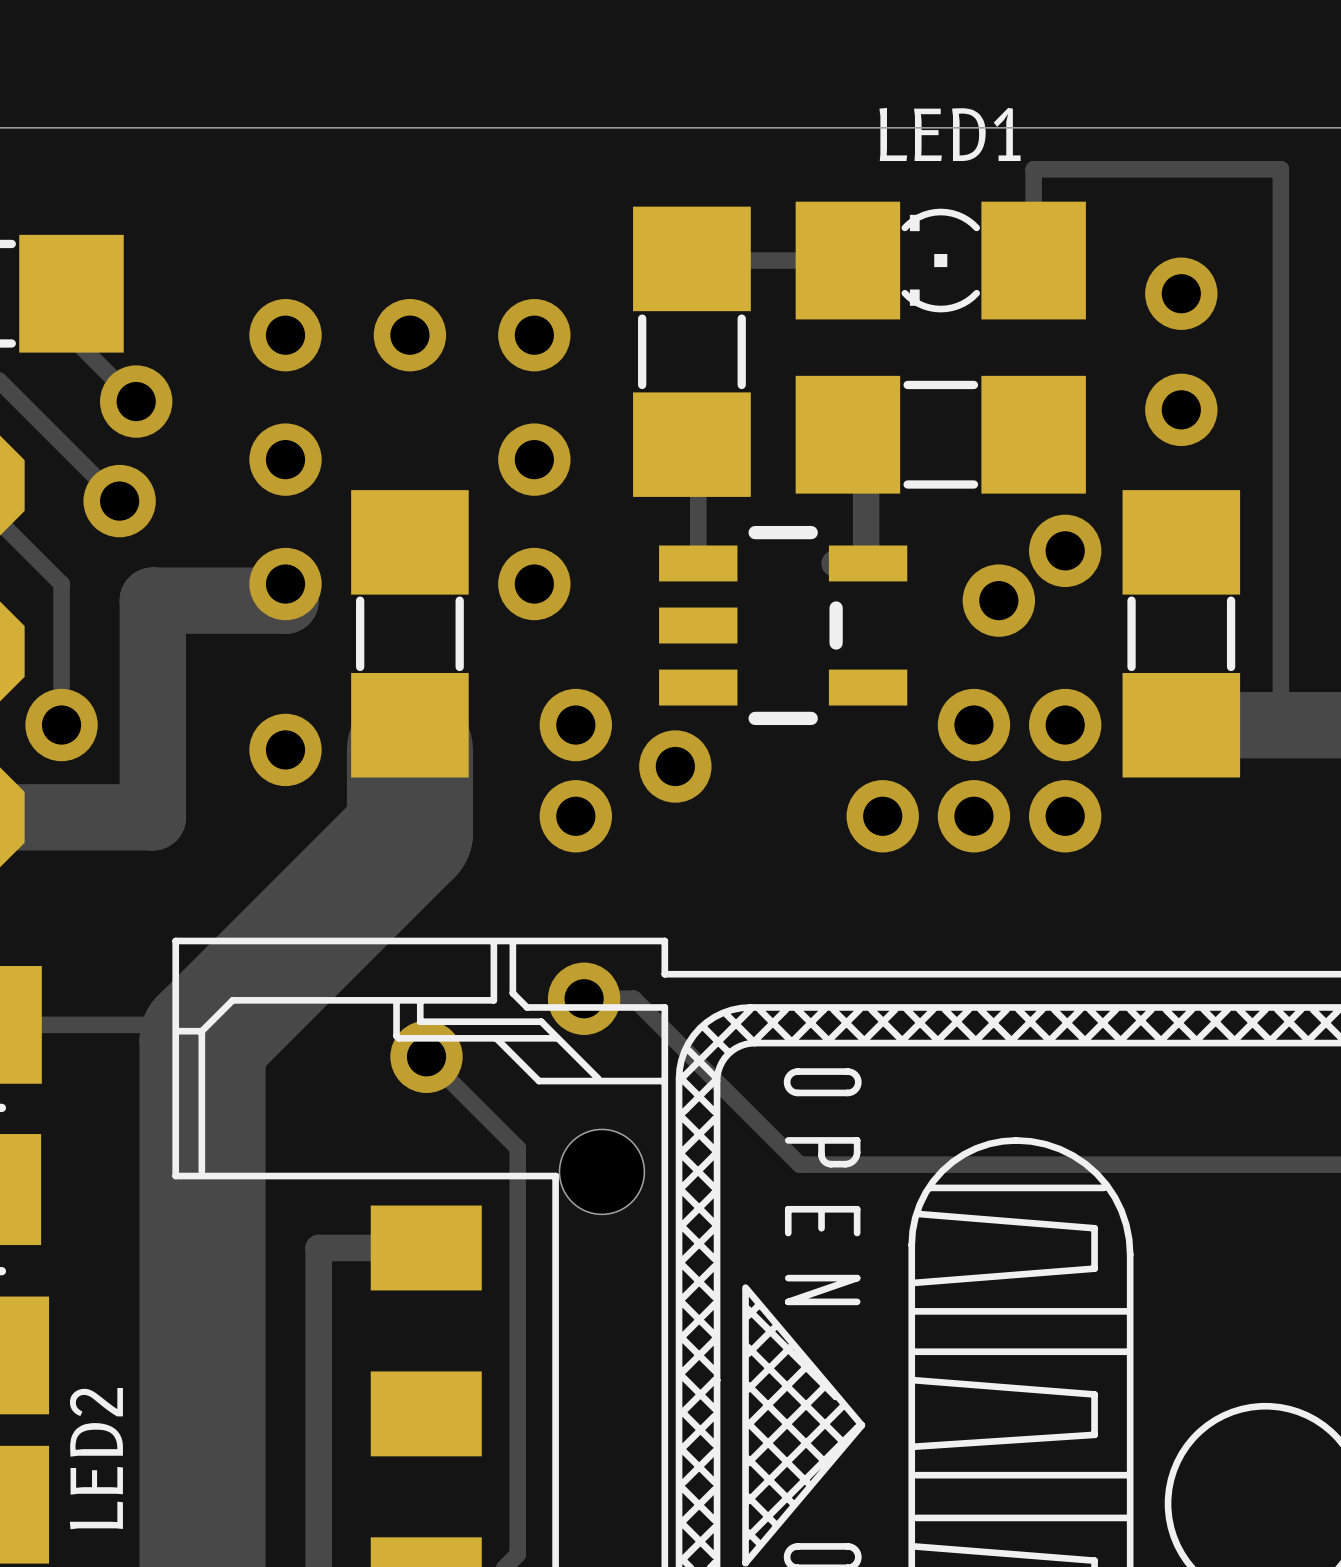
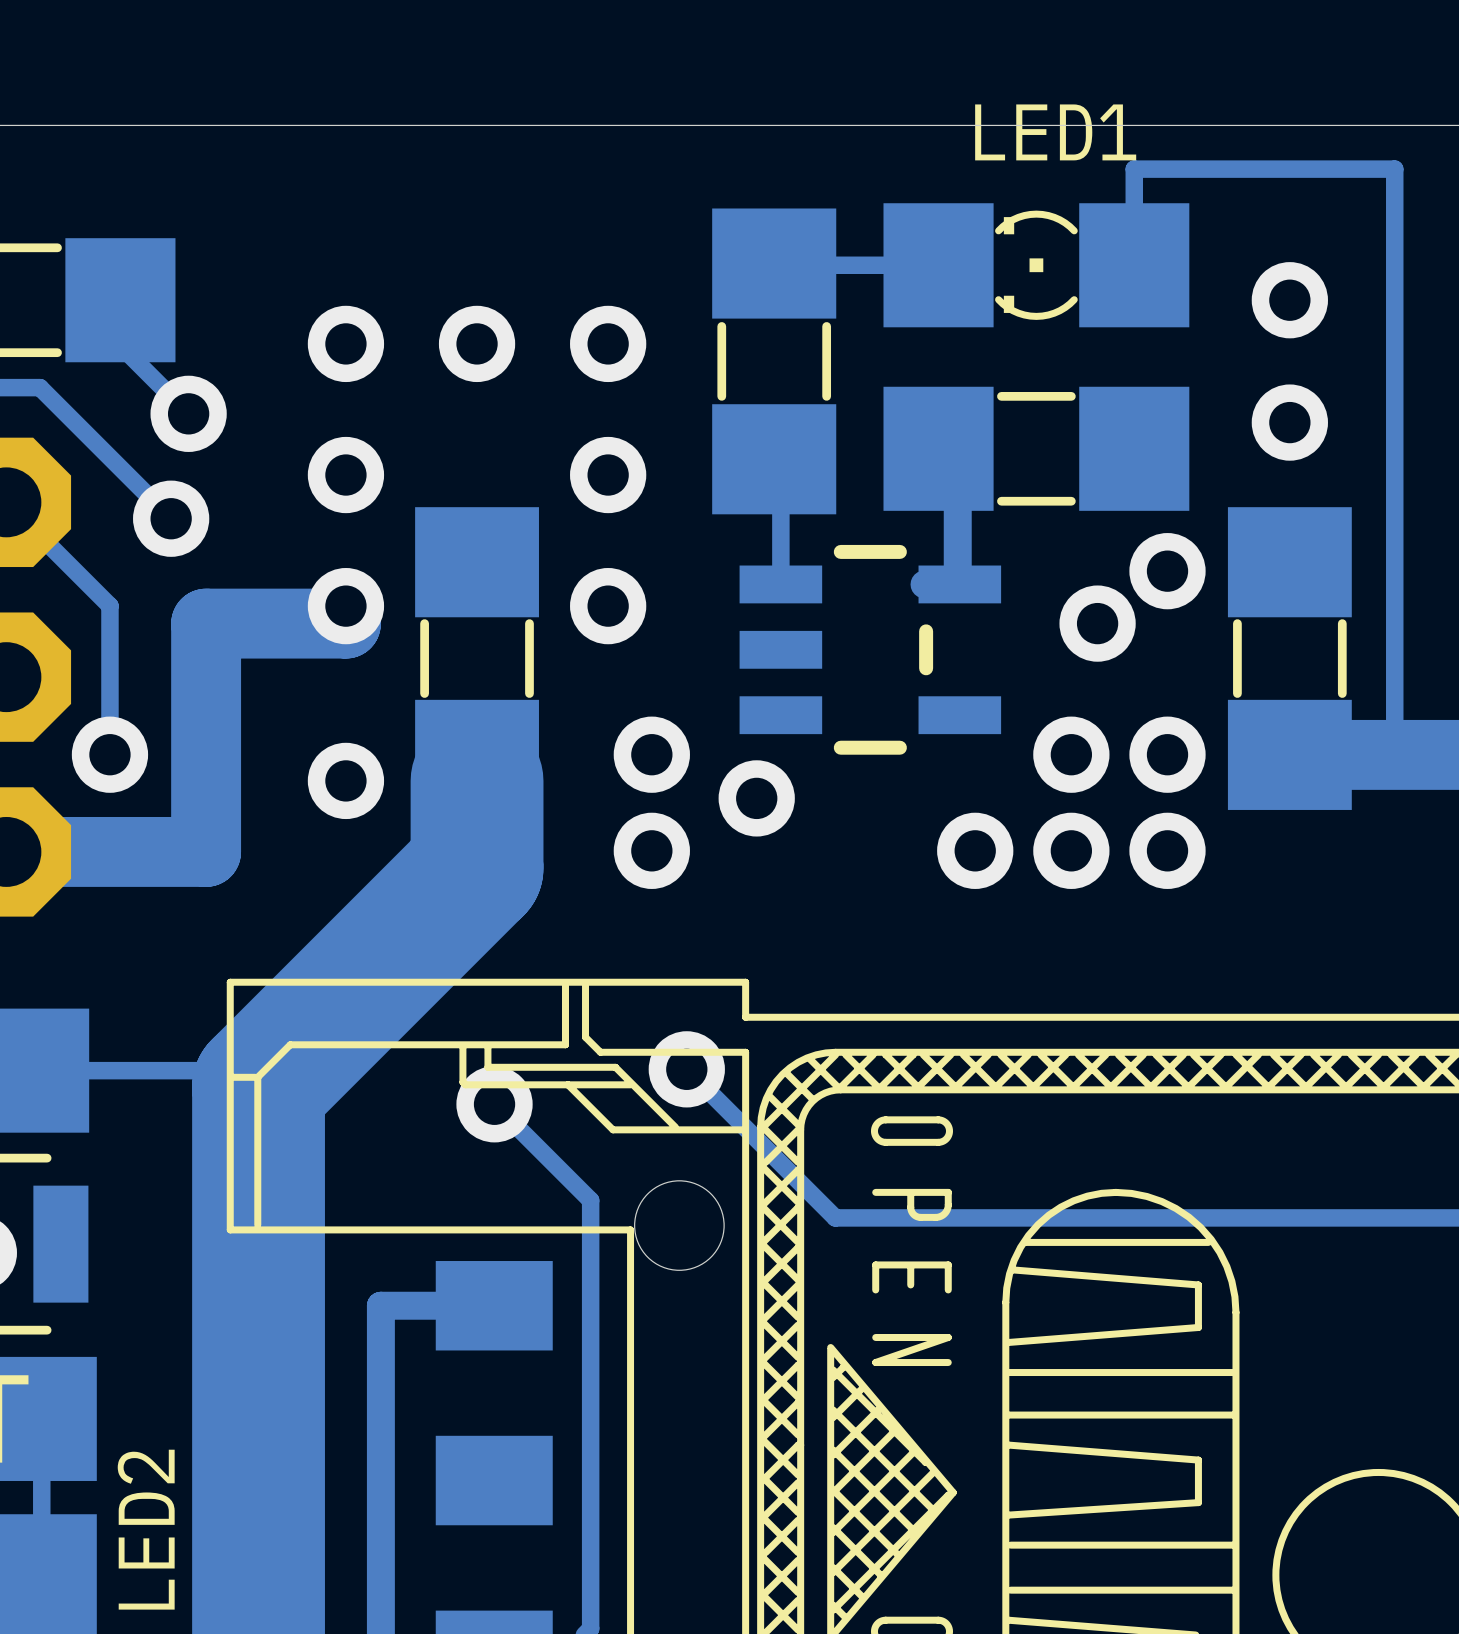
track: (584, 998) (633, 998) (799, 1164) -> (686, 1069) (835, 1217) (887, 1217)
via position: (584, 998) -> (686, 1069)

